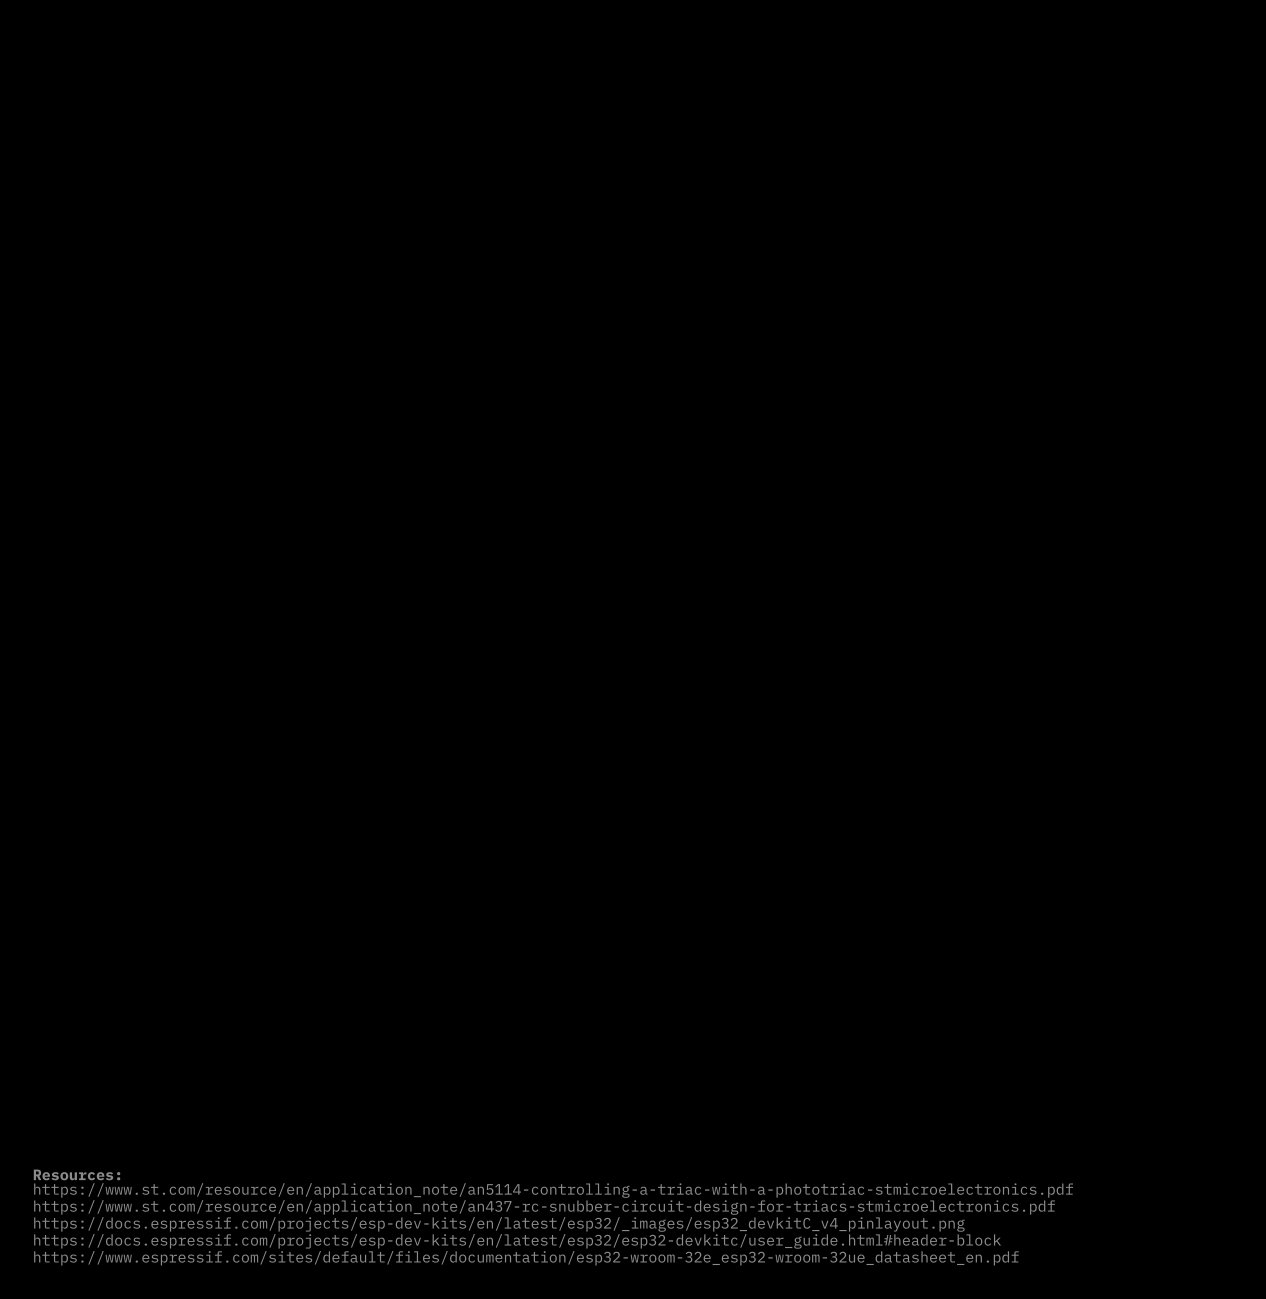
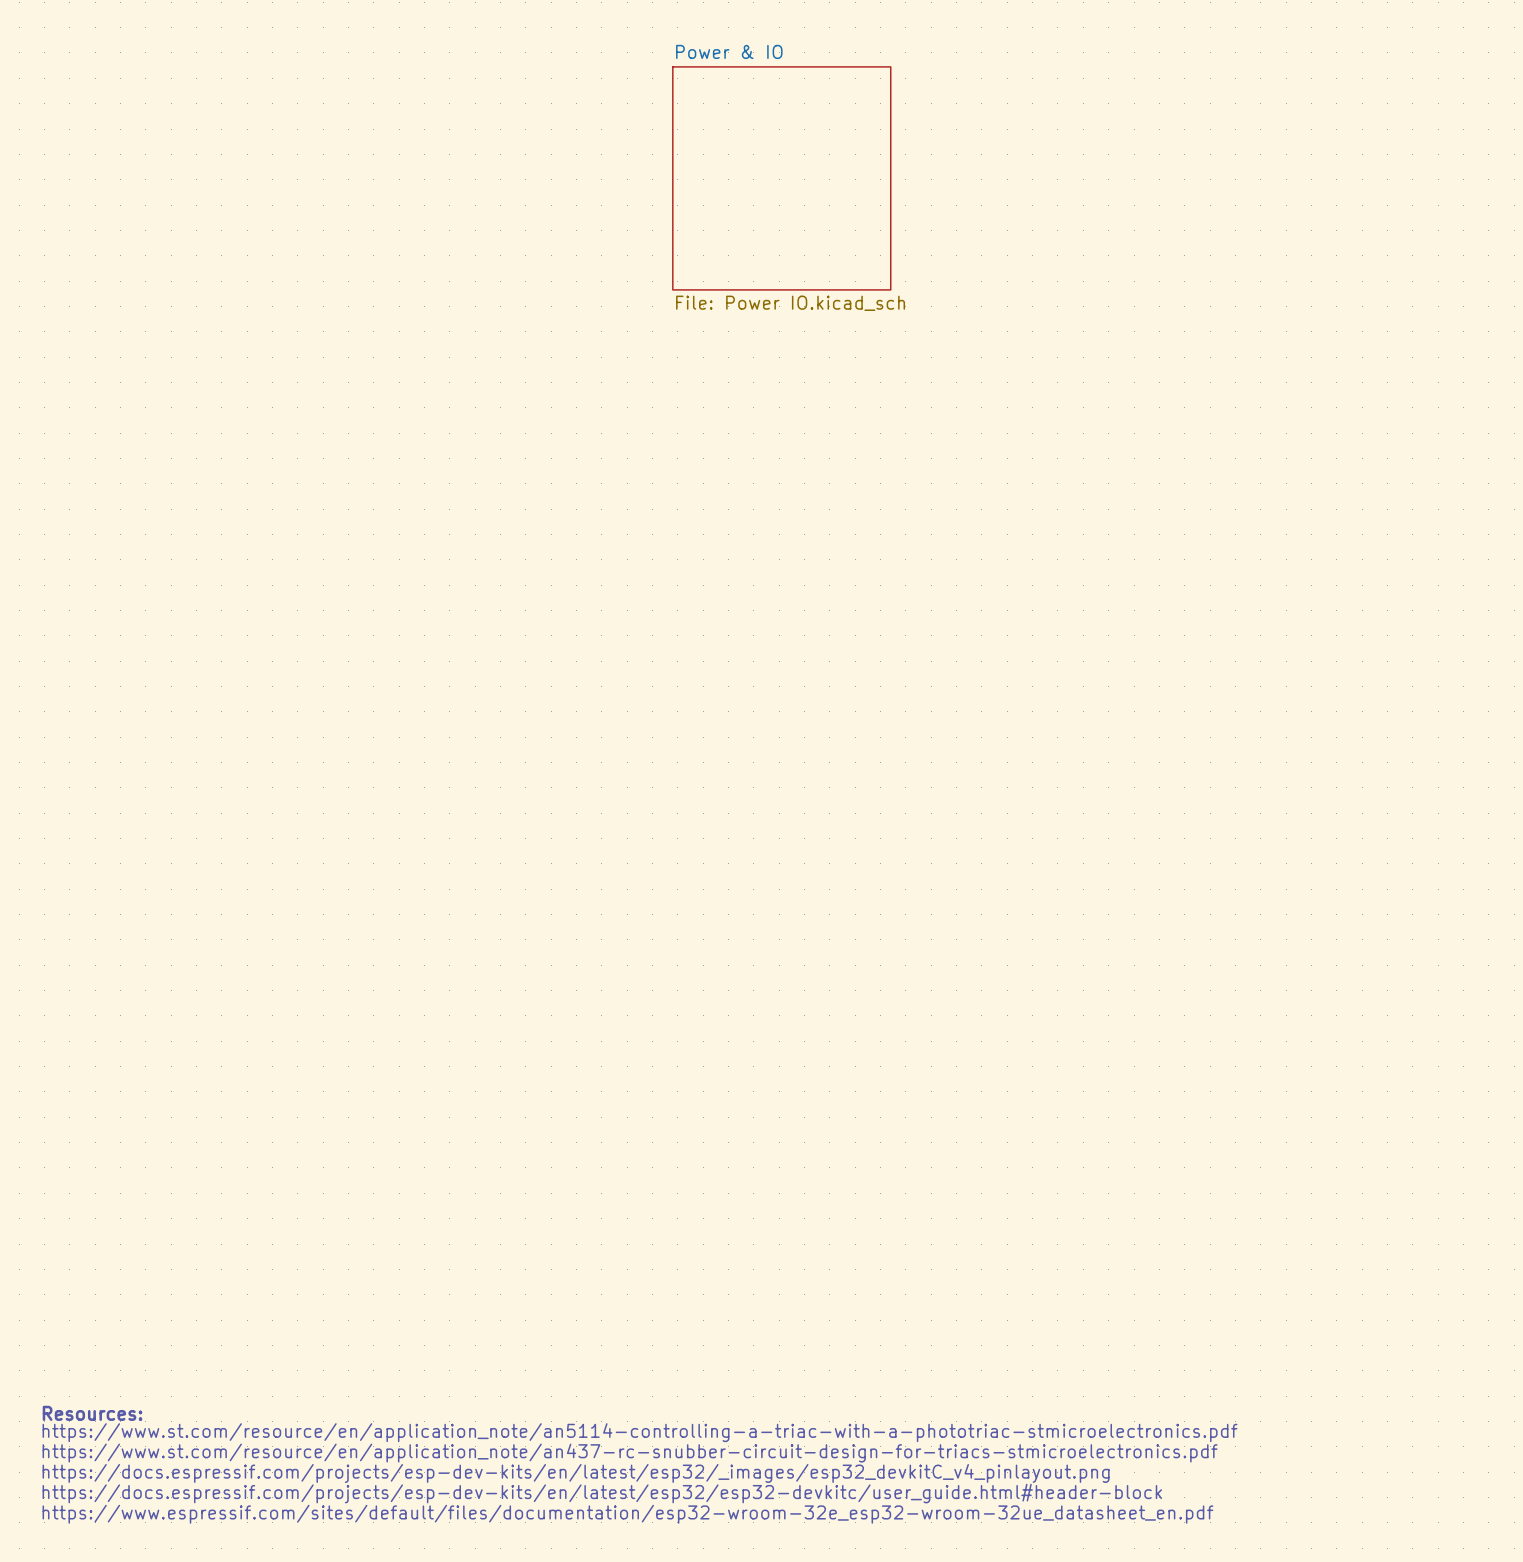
sheet Power & IO: none -> File: Power IO.kicad_sch (781, 178)

